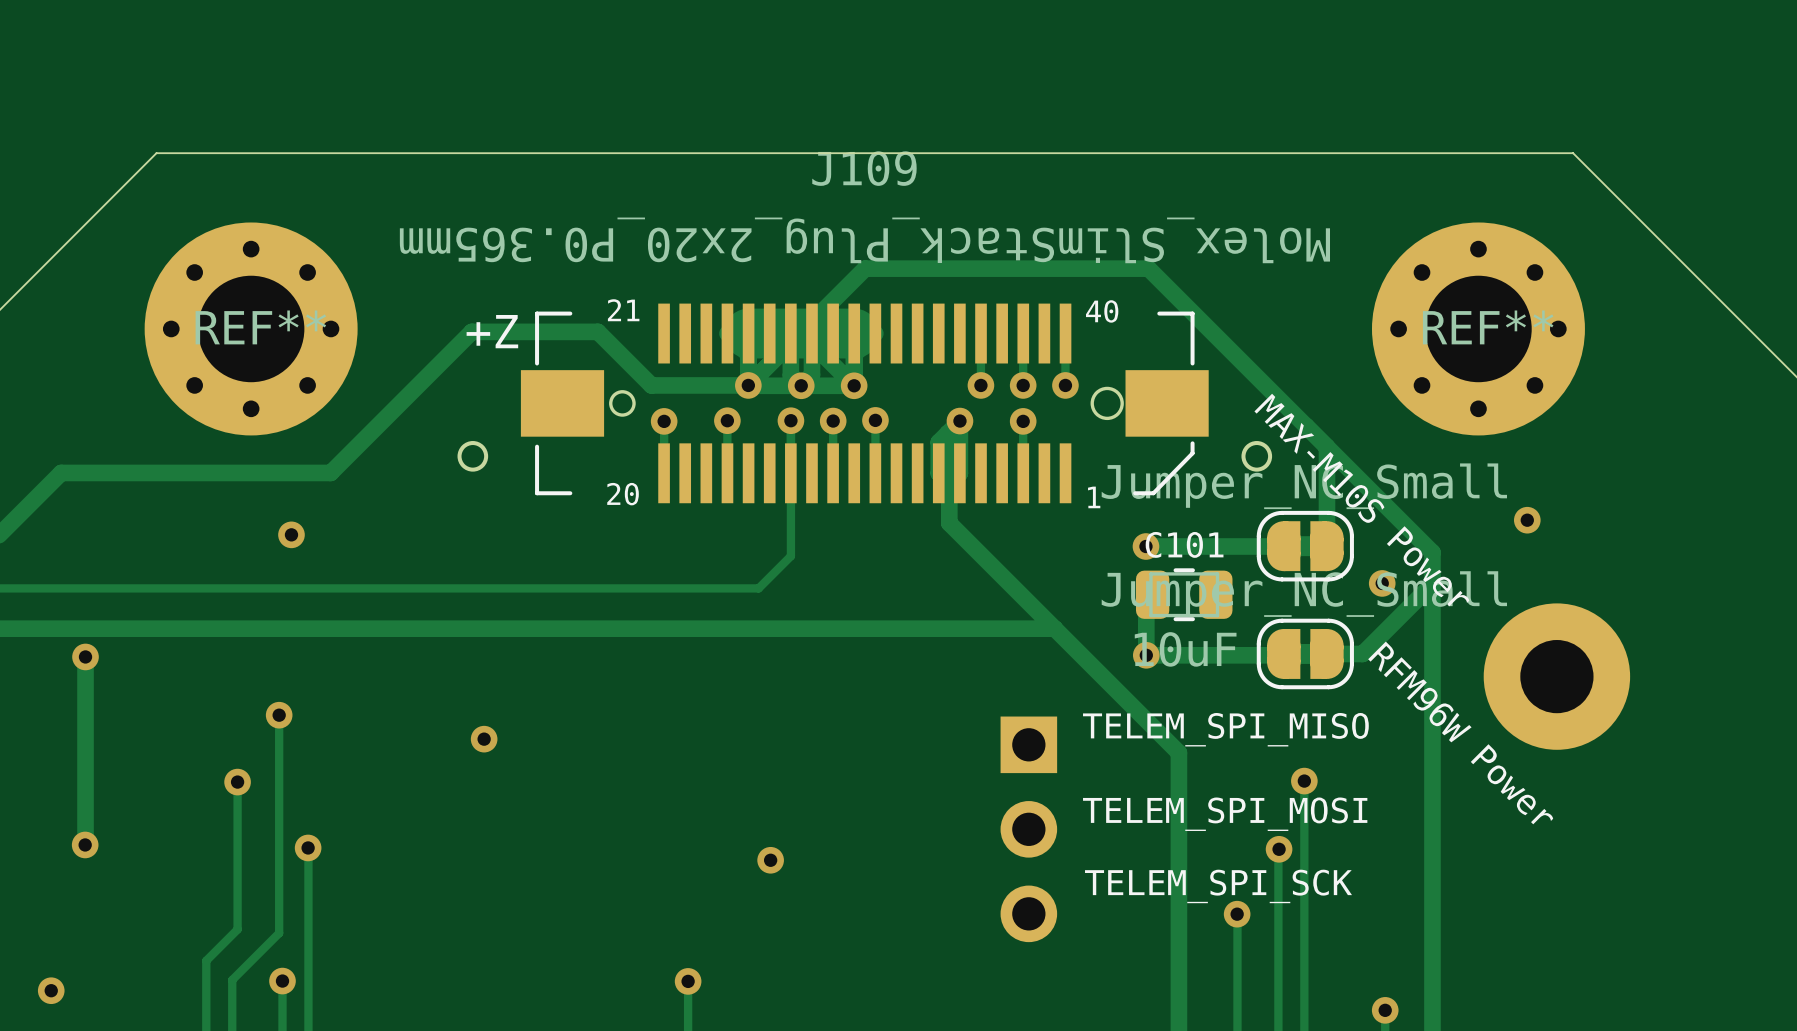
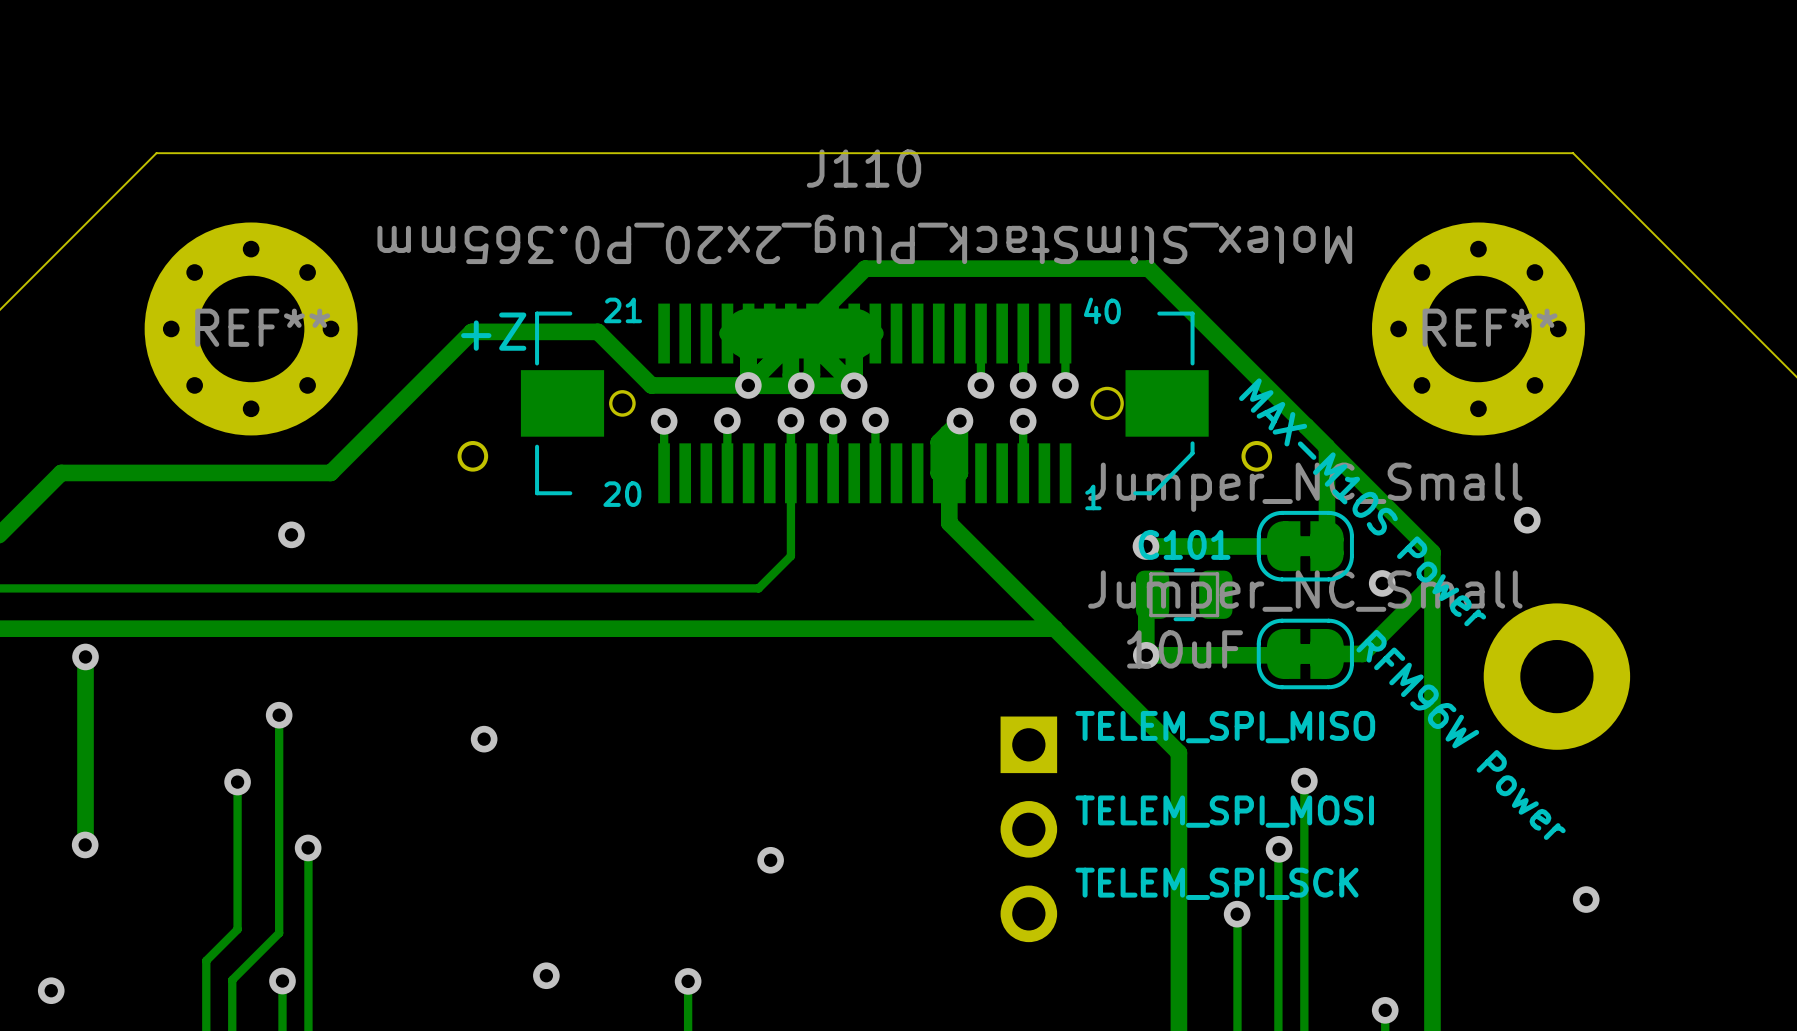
J109 name: J109 (864, 168) -> J110 (864, 168)
via: none -> (1586, 899)
via: none -> (546, 975)

